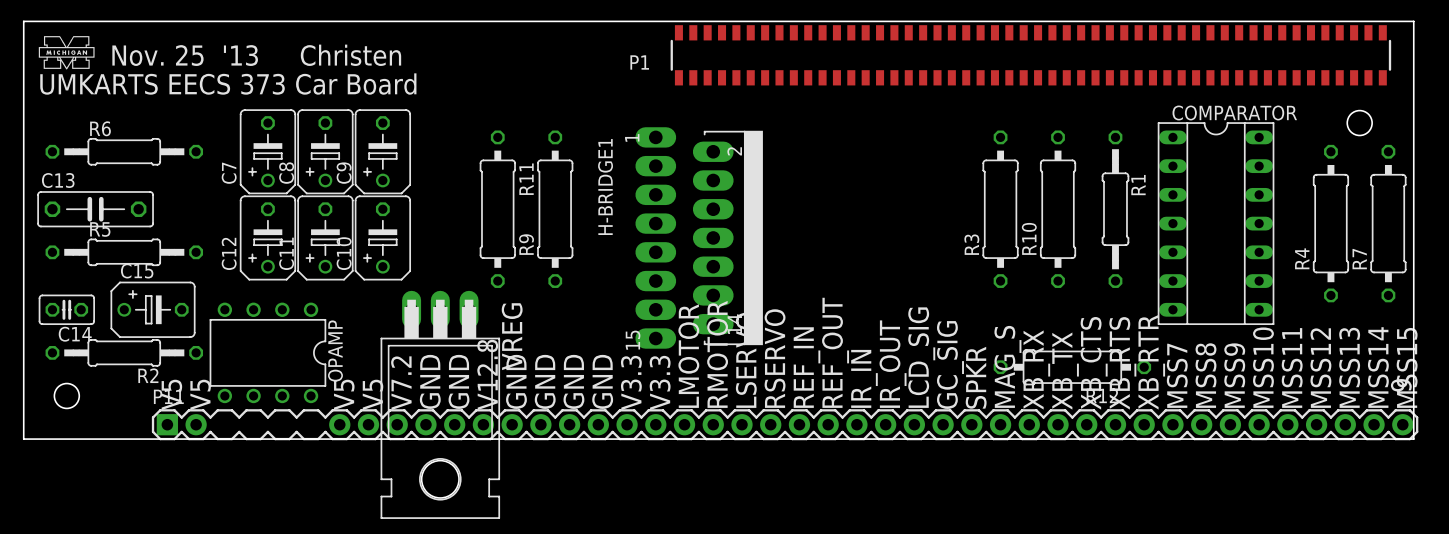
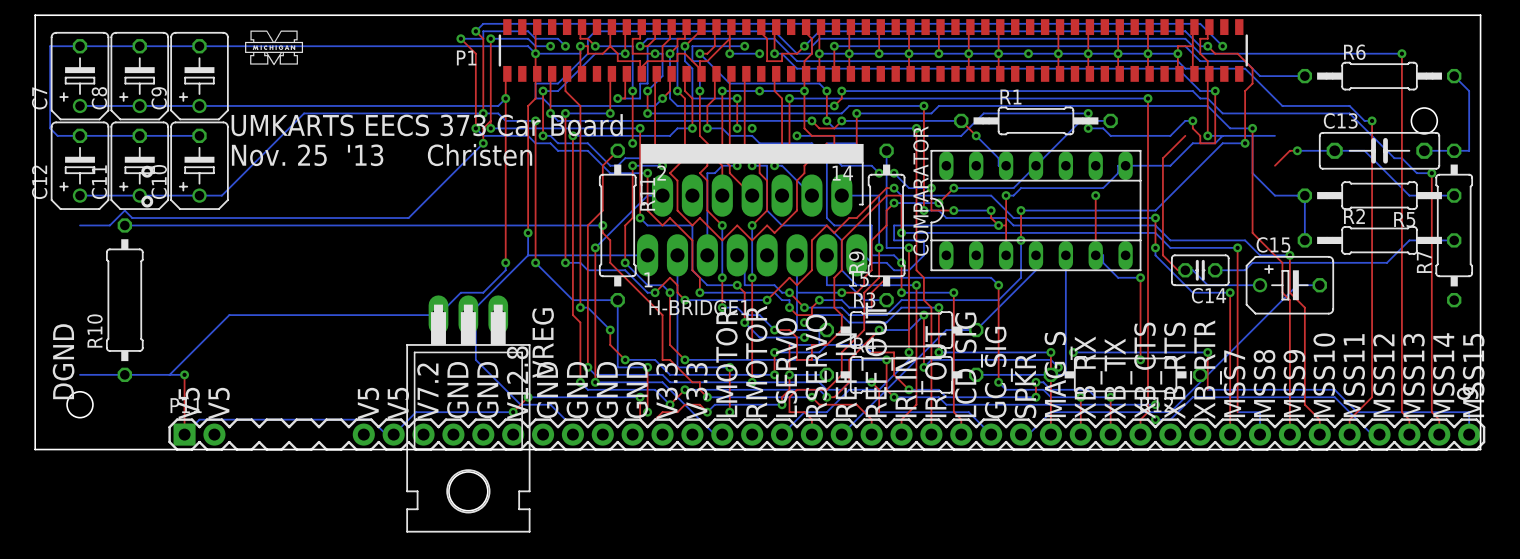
top track: none -> (537, 27) (535, 31) (537, 73) (535, 98) (528, 105) (528, 232)
top track: none -> (582, 27) (580, 38) (587, 38) (595, 46)
top track: none -> (611, 27) (610, 46)
top track: none -> (626, 27) (625, 53)
top track: none -> (641, 27) (640, 38) (632, 38) (632, 53) (655, 53)
top track: none -> (656, 27) (655, 38) (647, 46) (640, 46)
top track: none -> (671, 27) (670, 38) (662, 46) (662, 61)
top track: none -> (686, 27) (684, 38) (677, 38) (677, 46) (670, 53)
top track: none -> (701, 27) (699, 31) (684, 46)
top track: none -> (716, 27) (714, 46) (707, 53) (699, 53)
top track: none -> (731, 27) (729, 53)
top track: none -> (761, 27) (759, 31) (767, 38) (767, 61) (782, 61) (782, 53) (796, 53) (804, 46)
top track: none -> (776, 27) (774, 53)
top track: none -> (806, 27) (804, 31) (811, 38) (811, 53) (804, 61) (806, 73) (804, 76) (804, 128) (811, 135) (834, 135) (834, 158)
top track: none -> (821, 27) (819, 31) (821, 73)
top track: none -> (850, 27) (849, 31) (850, 73)
top track: none -> (880, 27) (879, 53)
top track: none -> (910, 27) (909, 31) (910, 73)
top track: none -> (940, 27) (938, 53)
top track: none -> (970, 27) (968, 31) (970, 73)
top track: none -> (1000, 27) (998, 31) (1000, 73)
top track: none -> (1060, 27) (1058, 31) (1060, 73)
top track: none -> (1089, 27) (1088, 31) (1089, 73)
top track: none -> (1119, 27) (1118, 31) (1119, 73)
top track: none -> (1149, 27) (1148, 31) (1149, 73)
top track: none -> (1194, 27) (1192, 31) (1194, 73)
top track: none -> (1209, 27) (1207, 38) (1200, 38) (1200, 53) (1207, 61) (1209, 73) (1207, 76) (1207, 135)
top track: none -> (475, 31) (483, 38) (483, 113)
bottom track: none -> (475, 31) (483, 23) (1200, 23) (1222, 46)
via: none -> (475, 31)
top track: none -> (460, 38) (475, 53) (475, 128)
bottom track: none -> (460, 38) (483, 38) (483, 31) (528, 31) (535, 38) (557, 38) (565, 46)
via: none -> (460, 38)
top track: none -> (490, 38) (490, 128)
bottom track: none -> (490, 38) (528, 38) (535, 46) (550, 46)
via: none -> (490, 38)
top track: none -> (729, 38) (707, 61) (699, 61) (699, 68)
via: none -> (550, 46)
via: none -> (565, 46)
bottom track: none -> (580, 46) (580, 53) (535, 53) (528, 46) (50, 46) (50, 128) (57, 135) (199, 135)
via: none -> (580, 46)
bottom track: none -> (595, 46) (632, 46) (632, 91)
via: none -> (595, 46)
top track: none -> (610, 46) (617, 53) (617, 61) (640, 61) (640, 68)
top track: none -> (610, 46) (602, 53) (587, 53) (587, 46) (580, 46) (582, 73)
bottom track: none -> (640, 46) (647, 38) (774, 38) (796, 61) (1177, 61) (1185, 68) (1245, 68) (1282, 105) (1349, 105) (1364, 120) (1372, 120)
via: none -> (640, 46)
bottom track: none -> (684, 46) (684, 61) (692, 68) (692, 98) (737, 98)
via: none -> (684, 46)
bottom track: none -> (744, 46) (692, 46) (692, 61) (699, 61) (699, 91)
via: none -> (744, 46)
bottom track: none -> (804, 46) (819, 31) (1185, 31) (1200, 46) (1207, 46)
via: none -> (804, 46)
top track: none -> (834, 46) (835, 73)
bottom track: none -> (834, 46) (1185, 46) (1200, 61) (1245, 61) (1260, 76) (1304, 76)
via: none -> (834, 46)
top track: none -> (1192, 46) (1177, 46) (1179, 73)
top track: none -> (1207, 46) (1215, 53) (1237, 53) (1252, 68) (1252, 83) (1245, 91) (1245, 143)
via: none -> (1207, 46)
via: none -> (1222, 46)
drawing position: (66, 52) -> (274, 47)
text position: Nov. 25 '13 Christen (256, 55) -> Nov. 25 '13 Christen (382, 155)
P1 position: (1030, 55) -> (873, 50)
via: none -> (535, 53)
bottom track: none -> (625, 53) (595, 53) (557, 91) (543, 91)
via: none -> (625, 53)
bottom track: none -> (655, 53) (662, 53) (662, 76) (647, 91)
via: none -> (655, 53)
bottom track: none -> (670, 53) (670, 98) (677, 105) (834, 105)
via: none -> (670, 53)
bottom track: none -> (699, 53) (729, 83) (819, 83) (826, 91)
via: none -> (699, 53)
bottom track: none -> (729, 53) (759, 53)
via: none -> (729, 53)
via: none -> (759, 53)
bottom track: none -> (774, 53) (782, 53) (796, 68) (1177, 68) (1200, 91) (1215, 91)
via: none -> (774, 53)
bottom track: none -> (819, 53) (1177, 53)
via: none -> (819, 53)
via: none -> (849, 53)
via: none -> (879, 53)
via: none -> (909, 53)
via: none -> (938, 53)
via: none -> (968, 53)
via: none -> (998, 53)
via: none -> (1028, 53)
via: none -> (1058, 53)
via: none -> (1088, 53)
via: none -> (1118, 53)
via: none -> (1148, 53)
via: none -> (1177, 53)
top track: none -> (1401, 53) (1401, 412) (1409, 419) (1409, 434)
bottom track: none -> (1401, 53) (1200, 53) (1185, 38) (819, 38) (811, 46) (811, 53) (796, 53) (774, 31) (595, 31) (587, 38) (587, 53) (557, 83) (535, 83) (535, 98) (543, 98) (550, 105) (655, 105) (662, 98)
via: none -> (1401, 53)
top track: none -> (640, 68) (647, 61) (677, 61) (677, 53) (684, 53) (699, 68)
top track: none -> (507, 73) (505, 76) (505, 262)
top track: none -> (552, 73) (550, 76) (550, 113)
top track: none -> (567, 73) (565, 91) (580, 105) (580, 307)
top track: none -> (611, 73) (610, 76) (610, 113)
top track: none -> (626, 73) (625, 98) (617, 98)
top track: none -> (656, 73) (655, 76) (655, 158) (662, 165)
top track: none -> (671, 73) (670, 91) (662, 98)
top track: none -> (686, 73) (684, 91) (692, 98) (692, 128)
top track: none -> (716, 73) (714, 98) (707, 105) (707, 128)
top track: none -> (731, 73) (729, 76) (729, 150)
top track: none -> (746, 73) (744, 76) (744, 158) (737, 165)
top track: none -> (776, 73) (774, 91) (782, 98) (782, 158) (774, 165)
bottom track: none -> (1454, 76) (1469, 91) (1469, 150) (1424, 150)
text position: UMKARTS EECS 373 Car Board (228, 84) -> UMKARTS EECS 373 Car Board (427, 125)
top track: none -> (543, 91) (543, 135)
via: none -> (543, 91)
top track: none -> (632, 91) (632, 143)
via: none -> (632, 91)
top track: none -> (647, 91) (647, 113)
via: none -> (647, 91)
top track: none -> (677, 91) (684, 98) (684, 158) (670, 173) (677, 180) (677, 210) (692, 225) (699, 218) (722, 240) (737, 225) (752, 240) (767, 225) (774, 232) (796, 210) (796, 180) (804, 173) (804, 165) (826, 143)
bottom track: none -> (677, 91) (677, 46) (647, 46) (647, 83) (640, 83) (640, 98) (617, 98)
via: none -> (677, 91)
top track: none -> (699, 91) (699, 135) (714, 150) (714, 158) (722, 165) (722, 195)
via: none -> (699, 91)
top track: none -> (722, 91) (722, 158) (729, 165) (729, 173) (752, 195)
bottom track: none -> (722, 91) (804, 91)
via: none -> (722, 91)
via: none -> (759, 91)
via: none -> (804, 91)
top track: none -> (826, 91) (826, 120)
via: none -> (826, 91)
top track: none -> (841, 91) (841, 98) (834, 105)
bottom track: none -> (841, 91) (1192, 91) (1200, 98) (1207, 98) (1222, 113) (1349, 113) (1394, 158) (1401, 158) (1416, 173) (1431, 173)
via: none -> (841, 91)
top track: none -> (1215, 91) (1215, 143) (1200, 143) (1200, 135) (1192, 128) (1192, 120)
via: none -> (1215, 91)
bottom track: none -> (505, 98) (498, 105) (80, 105)
via: none -> (505, 98)
via: none -> (617, 98)
via: none -> (662, 98)
top track: none -> (737, 98) (737, 128)
via: none -> (737, 98)
top track: none -> (789, 98) (789, 158)
bottom track: none -> (789, 98) (1148, 98)
via: none -> (789, 98)
top track: none -> (1148, 98) (1148, 412) (1140, 419) (1140, 434)
via: none -> (1148, 98)
via: none -> (834, 105)
top track: none -> (923, 105) (923, 210)
bottom track: none -> (923, 105) (849, 105) (841, 113) (647, 113)
via: none -> (923, 105)
via: none -> (483, 113)
bottom track: none -> (550, 113) (557, 120) (811, 120)
via: none -> (550, 113)
top track: none -> (565, 113) (565, 262)
bottom track: none -> (565, 113) (610, 113)
via: none -> (565, 113)
via: none -> (610, 113)
via: none -> (647, 113)
top track: none -> (856, 113) (856, 143)
bottom track: none -> (856, 113) (931, 113) (938, 105) (1207, 105) (1230, 128) (1252, 128)
via: none -> (856, 113)
bottom track: none -> (1088, 113) (983, 113) (961, 135) (796, 135)
via: none -> (1088, 113)
top track: none -> (490, 120) (483, 128) (483, 143)
top track: none -> (535, 120) (535, 262)
bottom track: none -> (535, 120) (505, 120) (498, 113) (304, 113) (221, 195) (80, 195)
via: none -> (535, 120)
top track: none -> (811, 120) (819, 128) (834, 128) (841, 120)
via: none -> (811, 120)
bottom track: none -> (826, 120) (834, 128) (916, 128)
via: none -> (826, 120)
bottom track: none -> (841, 120) (961, 120)
via: none -> (841, 120)
top track: none -> (961, 120) (976, 135)
bottom track: none -> (1110, 120) (1080, 120) (1013, 188) (953, 188)
bottom track: none -> (1192, 120) (1185, 120) (1170, 135) (1110, 135) (1103, 128) (1088, 128)
via: none -> (1192, 120)
top track: none -> (1372, 120) (1372, 397) (1349, 419) (1349, 434)
via: none -> (1372, 120)
H-BRIDGE1 footprint: [635, 127, 763, 349] -> [637, 143, 868, 277]
bottom track: none -> (475, 128) (483, 135) (528, 135) (535, 143) (550, 143) (557, 150) (587, 150) (610, 173) (647, 173)
via: none -> (475, 128)
bottom track: none -> (490, 128) (640, 128)
via: none -> (490, 128)
top track: none -> (640, 128) (640, 218)
via: none -> (640, 128)
bottom track: none -> (692, 128) (677, 128) (670, 135) (572, 135)
via: none -> (692, 128)
bottom track: none -> (707, 128) (722, 128) (729, 135) (752, 135) (759, 143) (811, 143) (826, 158) (826, 218) (834, 225) (871, 225) (871, 255) (894, 255) (901, 262)
via: none -> (707, 128)
via: none -> (737, 128)
via: none -> (752, 128)
top track: none -> (916, 128) (916, 270) (923, 277) (923, 300) (931, 307) (931, 434)
via: none -> (916, 128)
via: none -> (1088, 128)
top track: none -> (1252, 128) (1252, 232) (1282, 262) (1282, 292) (1289, 300) (1289, 434)
via: none -> (1252, 128)
bottom track: none -> (543, 135) (550, 135) (557, 143) (587, 143) (610, 165) (617, 165) (625, 158) (707, 158)
via: none -> (543, 135)
top track: none -> (572, 135) (572, 315) (580, 322) (580, 382)
via: none -> (572, 135)
via: none -> (796, 135)
bottom track: none -> (976, 135) (998, 158) (998, 165) (1006, 165)
via: none -> (976, 135)
top track: none -> (1185, 135) (1162, 158) (1162, 255) (1177, 270) (1185, 270)
bottom track: none -> (1207, 135) (1274, 135)
via: none -> (1207, 135)
bottom track: none -> (1222, 135) (1215, 143) (1192, 143) (1170, 165) (1118, 165) (1118, 173) (1103, 188) (1021, 188) (1013, 195) (1006, 195)
bottom track: none -> (1252, 135) (1252, 173) (1274, 195) (1304, 195)
bottom track: none -> (483, 143) (408, 218) (132, 218) (124, 210) (109, 225) (80, 225)
via: none -> (483, 143)
via: none -> (632, 143)
bottom track: none -> (826, 143) (856, 143)
bottom track: none -> (1245, 143) (1222, 143) (1155, 210) (1021, 210)
via: none -> (1245, 143)
R6 position: (124, 151) -> (1379, 76)
C7 position: (267, 151) -> (80, 76)
C8 position: (325, 151) -> (139, 76)
C9 position: (382, 151) -> (199, 76)
top track: none -> (617, 150) (602, 165) (602, 210) (587, 225) (587, 367)
top track: none -> (759, 150) (759, 173) (767, 180) (767, 210) (752, 225)
bottom track: none -> (886, 150) (886, 247) (909, 247)
top track: none -> (1297, 150) (1289, 150) (1274, 165)
bottom track: none -> (1297, 150) (1364, 150) (1409, 195) (1454, 195)
via: none -> (1297, 150)
top track: none -> (707, 158) (707, 165) (699, 173) (707, 180) (707, 210) (722, 225)
bottom track: none -> (834, 158) (841, 165) (871, 165) (879, 173)
drawing: none -> [141, 165, 154, 178]
top track: none -> (632, 165) (632, 218) (625, 225) (625, 262)
bottom track: none -> (632, 165) (662, 165)
via: none -> (632, 165)
via: none -> (662, 165)
bottom track: none -> (737, 165) (722, 165) (714, 173) (707, 173) (707, 255)
via: none -> (737, 165)
bottom track: none -> (752, 165) (767, 165) (767, 210) (782, 225) (826, 225) (841, 240) (841, 270) (856, 285) (916, 285)
via: none -> (752, 165)
bottom track: none -> (774, 165) (782, 165) (811, 195)
via: none -> (774, 165)
top track: none -> (647, 173) (647, 210) (662, 225) (670, 218) (692, 240) (692, 270) (699, 277) (699, 292)
via: none -> (647, 173)
via: none -> (879, 173)
bottom track: none -> (894, 173) (909, 188) (931, 188)
via: none -> (894, 173)
top track: none -> (1431, 173) (1431, 412) (1439, 419) (1439, 434)
via: none -> (1431, 173)
R1 name position: R1 (1138, 185) -> R1 (1010, 97)
H-BRIDGE1 name position: H-BRIDGE1 (605, 187) -> H-BRIDGE1 (699, 307)
top track: none -> (894, 188) (886, 188) (856, 218) (849, 218) (834, 232) (826, 225) (811, 240) (811, 270) (796, 285) (789, 277) (767, 300)
bottom track: none -> (894, 188) (901, 195) (991, 195) (1013, 218) (1155, 218)
via: none -> (894, 188)
top track: none -> (931, 188) (931, 210) (953, 210)
via: none -> (931, 188)
top track: none -> (953, 188) (938, 203)
via: none -> (953, 188)
drawing: none -> [141, 195, 154, 208]
bottom track: none -> (662, 195) (647, 195) (595, 247)
bottom track: none -> (841, 195) (879, 195) (879, 247)
top track: none -> (1006, 195) (1006, 255)
via: none -> (1006, 195)
top track: none -> (1095, 195) (1095, 255)
via: none -> (1095, 195)
bottom track: none -> (1297, 195) (1304, 203) (1304, 240)
top track: none -> (894, 203) (886, 210) (886, 225) (871, 240) (871, 270) (864, 277) (864, 285) (856, 292) (841, 292)
bottom track: none -> (894, 203) (938, 203)
via: none -> (894, 203)
via: none -> (938, 203)
C13 position: (95, 209) -> (1379, 150)
R11 position: (497, 209) -> (617, 225)
R9 position: (555, 209) -> (886, 225)
bottom track: none -> (923, 210) (938, 210) (946, 218) (1006, 218) (1013, 225) (1155, 225) (1170, 240) (1245, 240) (1260, 255) (1289, 255)
via: none -> (923, 210)
bottom track: none -> (953, 210) (991, 210)
via: none -> (953, 210)
top track: none -> (991, 210) (991, 218) (998, 225) (1006, 225)
via: none -> (991, 210)
top track: none -> (1021, 210) (1021, 240)
via: none -> (1021, 210)
R3 rotation: 0° (1000, 209) -> 90° clockwise (901, 330)
R3 position: (1000, 209) -> (901, 330)
R10 position: (1058, 209) -> (124, 300)
R1 rotation: 0° (1115, 209) -> 90° clockwise (1035, 120)
R1 position: (1115, 209) -> (1035, 120)
bottom track: none -> (640, 218) (647, 225) (692, 225) (692, 270) (707, 285) (737, 285)
via: none -> (640, 218)
top track: none -> (1155, 218) (1155, 247)
via: none -> (1155, 218)
bottom track: none -> (124, 225) (602, 225)
top track: none -> (602, 225) (602, 232) (610, 240) (610, 262) (662, 315) (662, 359) (670, 359) (692, 382) (699, 382) (699, 389) (707, 397)
via: none -> (602, 225)
bottom track: none -> (722, 225) (722, 277)
via: none -> (722, 225)
bottom track: none -> (752, 225) (752, 277)
via: none -> (752, 225)
bottom track: none -> (998, 225) (894, 225) (894, 240) (923, 240) (923, 255) (909, 270) (894, 270) (886, 262) (871, 262) (864, 255) (856, 255)
via: none -> (998, 225)
COMPARATOR rotation: 0° (1216, 223) -> 90° counterclockwise (1035, 210)
COMPARATOR position: (1216, 223) -> (1035, 210)
R4 rotation: 0° (1330, 223) -> 90° clockwise (901, 374)
R4 position: (1330, 223) -> (901, 374)
R5 name position: R5 (100, 229) -> R5 (1404, 219)
bottom track: none -> (528, 232) (528, 255)
via: none -> (528, 232)
top track: none -> (901, 232) (901, 195) (886, 195) (841, 240) (841, 270) (834, 277) (834, 307) (841, 315) (841, 330) (826, 344) (811, 344) (811, 359) (796, 359) (796, 337) (789, 330) (774, 330)
bottom track: none -> (901, 232) (1155, 232) (1170, 247) (1237, 247)
via: none -> (901, 232)
C12 position: (267, 237) -> (80, 165)
C11 position: (325, 237) -> (139, 165)
C10 position: (382, 237) -> (199, 165)
bottom track: none -> (1021, 240) (1021, 277) (998, 300) (901, 300) (886, 315) (849, 315) (841, 307) (804, 307)
via: none -> (1021, 240)
bottom track: none -> (1454, 240) (1409, 240) (1387, 262) (1252, 262) (1245, 270) (1215, 270)
top track: none -> (595, 247) (595, 382)
via: none -> (595, 247)
top track: none -> (879, 247) (879, 277) (864, 292) (864, 330) (841, 352) (841, 374) (826, 389) (796, 389) (789, 397) (789, 412) (804, 412) (811, 419) (811, 434)
via: none -> (879, 247)
top track: none -> (909, 247) (909, 352)
via: none -> (909, 247)
bottom track: none -> (1155, 247) (1155, 255) (1192, 292) (1230, 292)
via: none -> (1155, 247)
top track: none -> (1237, 247) (1237, 412)
via: none -> (1237, 247)
R5 position: (124, 252) -> (1379, 195)
bottom track: none -> (528, 255) (647, 255)
bottom track: none -> (528, 255) (468, 315) (475, 315) (475, 359) (520, 404) (550, 404) (565, 419)
bottom track: none -> (677, 255) (677, 367) (729, 367)
bottom track: none -> (737, 255) (744, 262) (744, 285) (774, 285) (782, 292) (789, 292)
bottom track: none -> (796, 255) (789, 255) (789, 262) (796, 270) (796, 330) (826, 330)
bottom track: none -> (826, 255) (826, 285) (849, 285) (864, 300) (886, 300)
bottom track: none -> (1035, 255) (1035, 270) (976, 330) (946, 330) (841, 434)
bottom track: none -> (1065, 255) (1065, 374) (976, 374)
bottom track: none -> (1095, 255) (1103, 255) (1103, 262) (1118, 277) (1140, 277)
top track: none -> (1289, 255) (1289, 292) (1304, 307) (1304, 404) (1319, 419) (1319, 434)
via: none -> (1289, 255)
bottom track: none -> (505, 262) (505, 270) (483, 292) (460, 292) (445, 307) (445, 315) (229, 315) (169, 374)
via: none -> (505, 262)
bottom track: none -> (535, 262) (572, 300) (617, 300) (617, 367) (647, 367)
via: none -> (535, 262)
bottom track: none -> (565, 262) (580, 262) (587, 270) (625, 270) (647, 292) (655, 292)
via: none -> (565, 262)
bottom track: none -> (625, 262) (647, 285) (662, 285) (670, 292)
via: none -> (625, 262)
top track: none -> (901, 262) (901, 292)
via: none -> (901, 262)
bottom track: none -> (1185, 270) (1192, 270) (1207, 285) (1260, 285)
top track: none -> (722, 277) (722, 307)
via: none -> (722, 277)
top track: none -> (752, 277) (752, 382)
via: none -> (752, 277)
top track: none -> (886, 277) (871, 292) (871, 307)
bottom track: none -> (886, 277) (991, 277) (998, 285)
top track: none -> (1140, 277) (1140, 359)
via: none -> (1140, 277)
top track: none -> (737, 285) (744, 292) (744, 322)
via: none -> (737, 285)
top track: none -> (916, 285) (916, 404) (901, 419) (901, 434)
via: none -> (916, 285)
top track: none -> (998, 285) (998, 382)
via: none -> (998, 285)
bottom track: none -> (1319, 285) (1297, 285) (1170, 412) (1050, 412) (1028, 434) (1021, 434)
top track: none -> (655, 292) (670, 277) (677, 285) (677, 292) (684, 300)
via: none -> (655, 292)
top track: none -> (670, 292) (670, 344) (684, 359)
via: none -> (670, 292)
bottom track: none -> (699, 292) (774, 292) (782, 300) (789, 300) (789, 307)
via: none -> (699, 292)
top track: none -> (789, 292) (804, 307)
via: none -> (789, 292)
bottom track: none -> (796, 292) (841, 292)
via: none -> (841, 292)
bottom track: none -> (901, 292) (953, 292)
via: none -> (901, 292)
top track: none -> (953, 292) (953, 412) (961, 419) (961, 434)
via: none -> (953, 292)
top track: none -> (1230, 292) (1230, 434)
via: none -> (1230, 292)
bottom track: none -> (684, 300) (767, 300)
via: none -> (684, 300)
via: none -> (767, 300)
top track: none -> (819, 300) (811, 307) (811, 315) (796, 315) (789, 307)
bottom track: none -> (819, 300) (841, 300) (849, 307) (871, 307)
via: none -> (819, 300)
bottom track: none -> (580, 307) (587, 307) (610, 330)
via: none -> (580, 307)
bottom track: none -> (722, 307) (737, 307) (744, 315) (759, 315) (774, 330)
via: none -> (722, 307)
via: none -> (789, 307)
via: none -> (804, 307)
top track: none -> (938, 307) (938, 352)
bottom track: none -> (938, 307) (901, 307) (886, 322) (849, 322) (841, 315) (811, 315) (804, 322)
via: none -> (938, 307)
C14 position: (66, 309) -> (1200, 270)
C15 position: (153, 309) -> (1289, 285)
top track: none -> (923, 315) (923, 367)
bottom track: none -> (923, 315) (909, 330) (879, 330)
via: none -> (923, 315)
bottom track: none -> (744, 322) (759, 337) (804, 337)
via: none -> (744, 322)
via: none -> (804, 322)
top track: none -> (610, 330) (610, 344) (625, 359)
via: none -> (610, 330)
via: none -> (774, 330)
bottom track: none -> (819, 330) (819, 344) (789, 344)
top track: none -> (879, 330) (849, 359) (849, 382) (834, 397) (826, 397)
via: none -> (879, 330)
via: none -> (804, 337)
top track: none -> (789, 344) (789, 389) (782, 397) (782, 404)
top track: none -> (774, 352) (774, 374)
bottom track: none -> (774, 352) (819, 352) (826, 344) (864, 344) (871, 352)
via: none -> (774, 352)
top track: none -> (871, 352) (894, 352) (894, 374) (909, 389)
bottom track: none -> (909, 352) (909, 359) (879, 389) (849, 389) (826, 412) (804, 412) (789, 427) (789, 434) (782, 434)
via: none -> (909, 352)
bottom track: none -> (938, 352) (1050, 352)
via: none -> (938, 352)
top track: none -> (1050, 352) (1050, 434)
via: none -> (1050, 352)
bottom track: none -> (1073, 352) (1207, 352)
via: none -> (1073, 352)
top track: none -> (1207, 352) (1207, 389)
via: none -> (1207, 352)
R2 position: (124, 352) -> (1379, 240)
OPAMP: (267, 352) -> none
bottom track: none -> (625, 359) (655, 359) (670, 374) (774, 374)
via: none -> (625, 359)
bottom track: none -> (684, 359) (886, 359)
via: none -> (684, 359)
top track: none -> (886, 359) (886, 389) (894, 397)
via: none -> (886, 359)
via: none -> (1140, 359)
text: none -> DGND (63, 361)
bottom track: none -> (587, 367) (595, 374) (662, 374) (670, 382) (819, 382) (826, 389) (841, 389) (849, 382) (871, 382)
via: none -> (587, 367)
top track: none -> (647, 367) (647, 412)
via: none -> (647, 367)
top track: none -> (729, 367) (729, 412)
via: none -> (729, 367)
bottom track: none -> (923, 367) (931, 359) (1050, 359) (1058, 367)
via: none -> (923, 367)
via: none -> (1058, 367)
bottom track: none -> (80, 374) (184, 374)
top track: none -> (184, 374) (184, 434)
via: none -> (184, 374)
via: none -> (774, 374)
bottom track: none -> (789, 374) (826, 374)
via: none -> (789, 374)
bottom track: none -> (580, 382) (587, 389) (655, 389) (670, 404)
via: none -> (580, 382)
bottom track: none -> (595, 382) (662, 382) (714, 434) (722, 434)
via: none -> (595, 382)
via: none -> (752, 382)
top track: none -> (871, 382) (879, 389) (879, 412)
via: none -> (871, 382)
bottom track: none -> (998, 382) (1006, 389) (1043, 389) (1050, 397) (1080, 397)
via: none -> (998, 382)
top track: none -> (1035, 382) (1035, 397)
bottom track: none -> (1035, 382) (1043, 382) (1050, 389) (1088, 389) (1095, 397) (1110, 397)
via: none -> (1035, 382)
R2 name position: R2 (148, 375) -> R2 (1354, 216)
top track: none -> (684, 389) (670, 404)
bottom track: none -> (684, 389) (819, 389) (826, 397)
via: none -> (684, 389)
bottom track: none -> (909, 389) (938, 389) (946, 397) (1035, 397)
via: none -> (909, 389)
bottom track: none -> (1207, 389) (1334, 389) (1357, 412) (1469, 412) (1469, 434)
top track: none -> (528, 397) (513, 412)
bottom track: none -> (528, 397) (640, 397)
via: none -> (528, 397)
top track: none -> (640, 397) (640, 419) (647, 427) (662, 412) (677, 412) (684, 404) (699, 404) (707, 412)
via: none -> (640, 397)
bottom track: none -> (707, 397) (811, 397)
via: none -> (707, 397)
top track: none -> (811, 397) (819, 404) (856, 404) (871, 419) (871, 434)
via: none -> (811, 397)
via: none -> (826, 397)
bottom track: none -> (894, 397) (938, 397) (946, 404) (1155, 404)
via: none -> (894, 397)
via: none -> (1035, 397)
top track: none -> (1080, 397) (1080, 434)
via: none -> (1080, 397)
top track: none -> (1110, 397) (1110, 434)
via: none -> (1110, 397)
via: none -> (670, 404)
bottom track: none -> (782, 404) (714, 404) (707, 412)
via: none -> (782, 404)
via: none -> (1155, 404)
bottom track: none -> (513, 412) (416, 412) (401, 427) (401, 434) (386, 434) (371, 419) (199, 419) (192, 427) (192, 434) (184, 434)
via: none -> (513, 412)
via: none -> (647, 412)
via: none -> (707, 412)
via: none -> (729, 412)
bottom track: none -> (879, 412) (968, 412) (983, 427) (983, 434) (991, 434)
bottom track: none -> (1237, 412) (1260, 412) (1260, 434)
bottom track: none -> (1155, 419) (1170, 419) (1192, 397) (1334, 397) (1372, 434) (1379, 434)
via: none -> (1155, 419)

